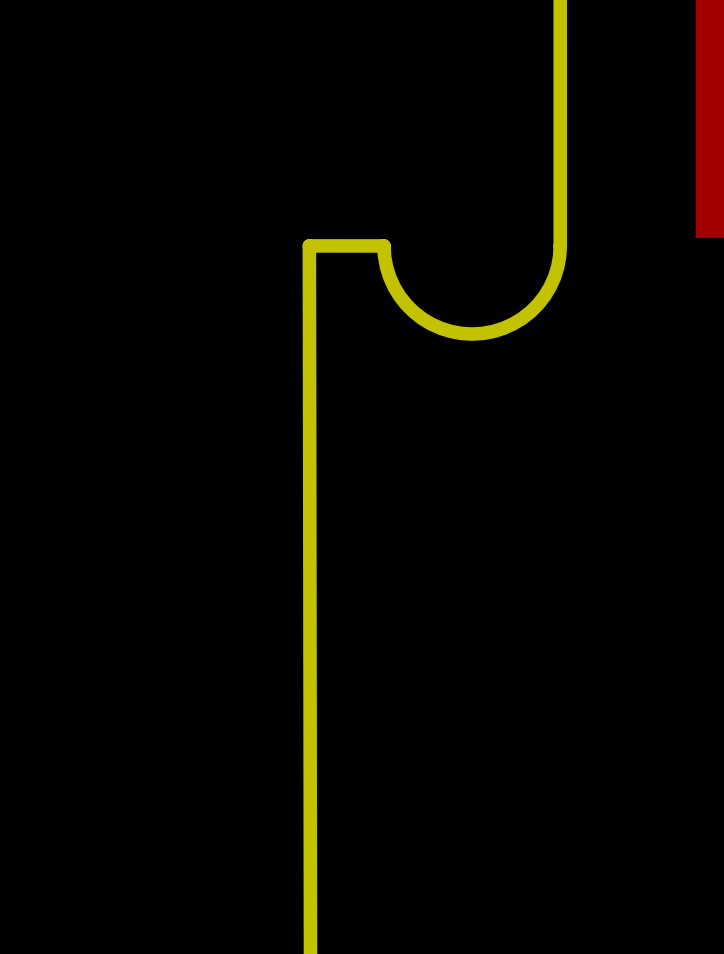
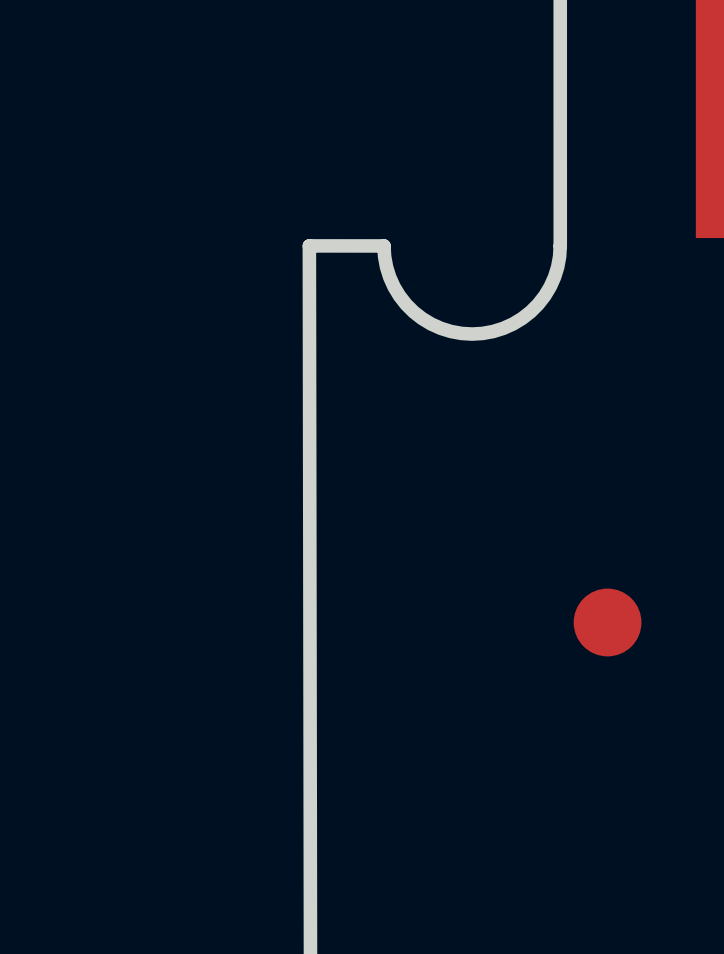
part: none -> (607, 622)

